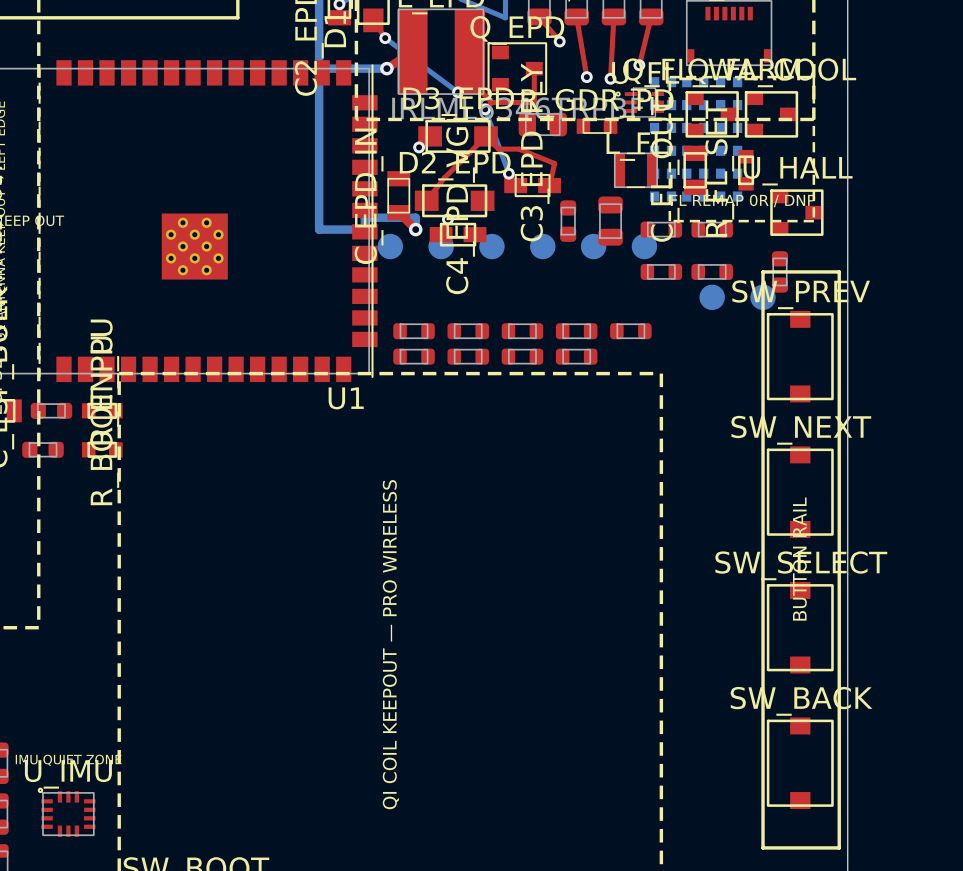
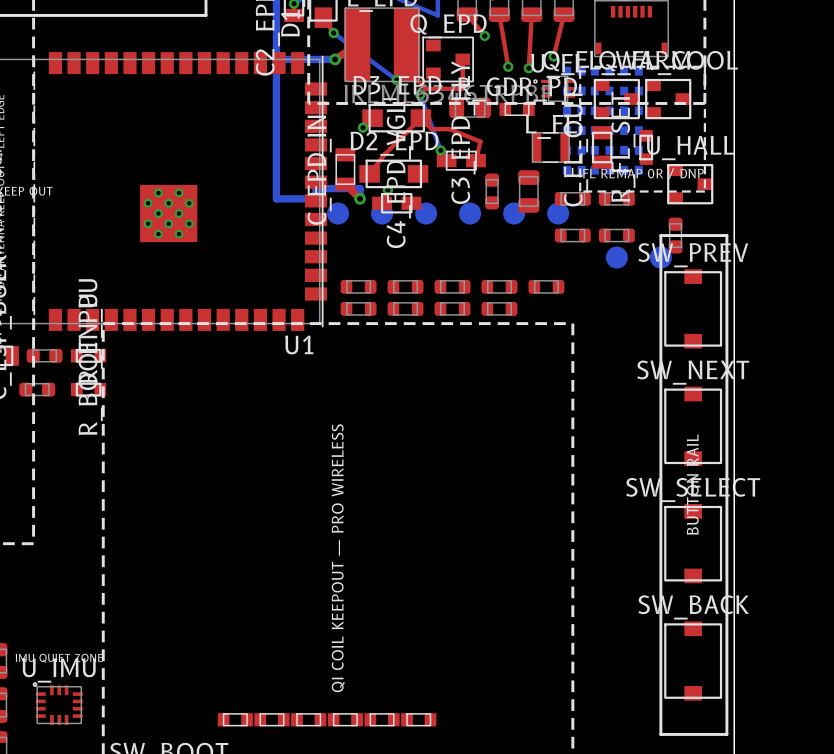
part: none -> (235, 719)
part: none -> (272, 719)
part: none -> (308, 719)
part: none -> (345, 719)
part: none -> (382, 719)
part: none -> (418, 719)

